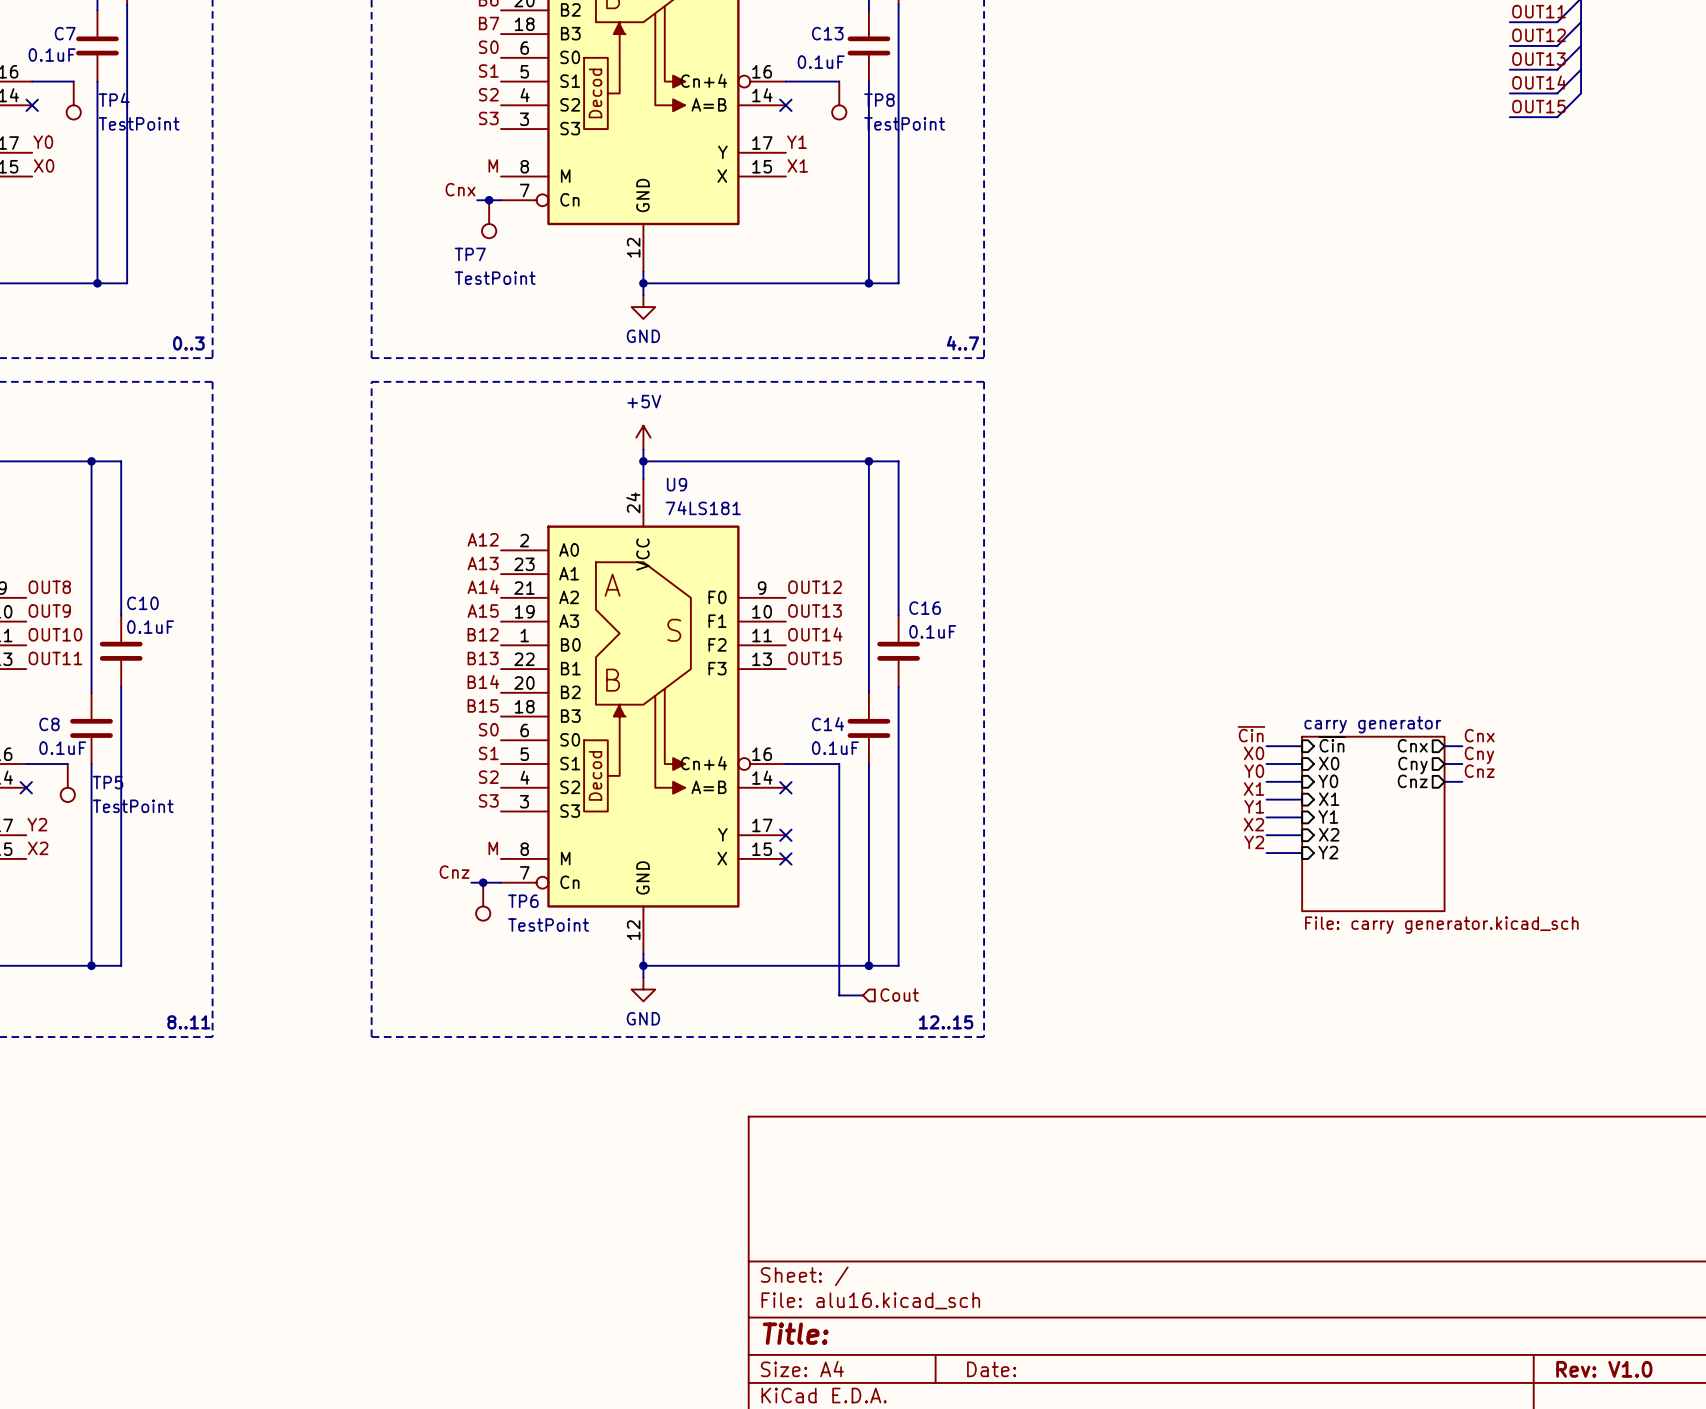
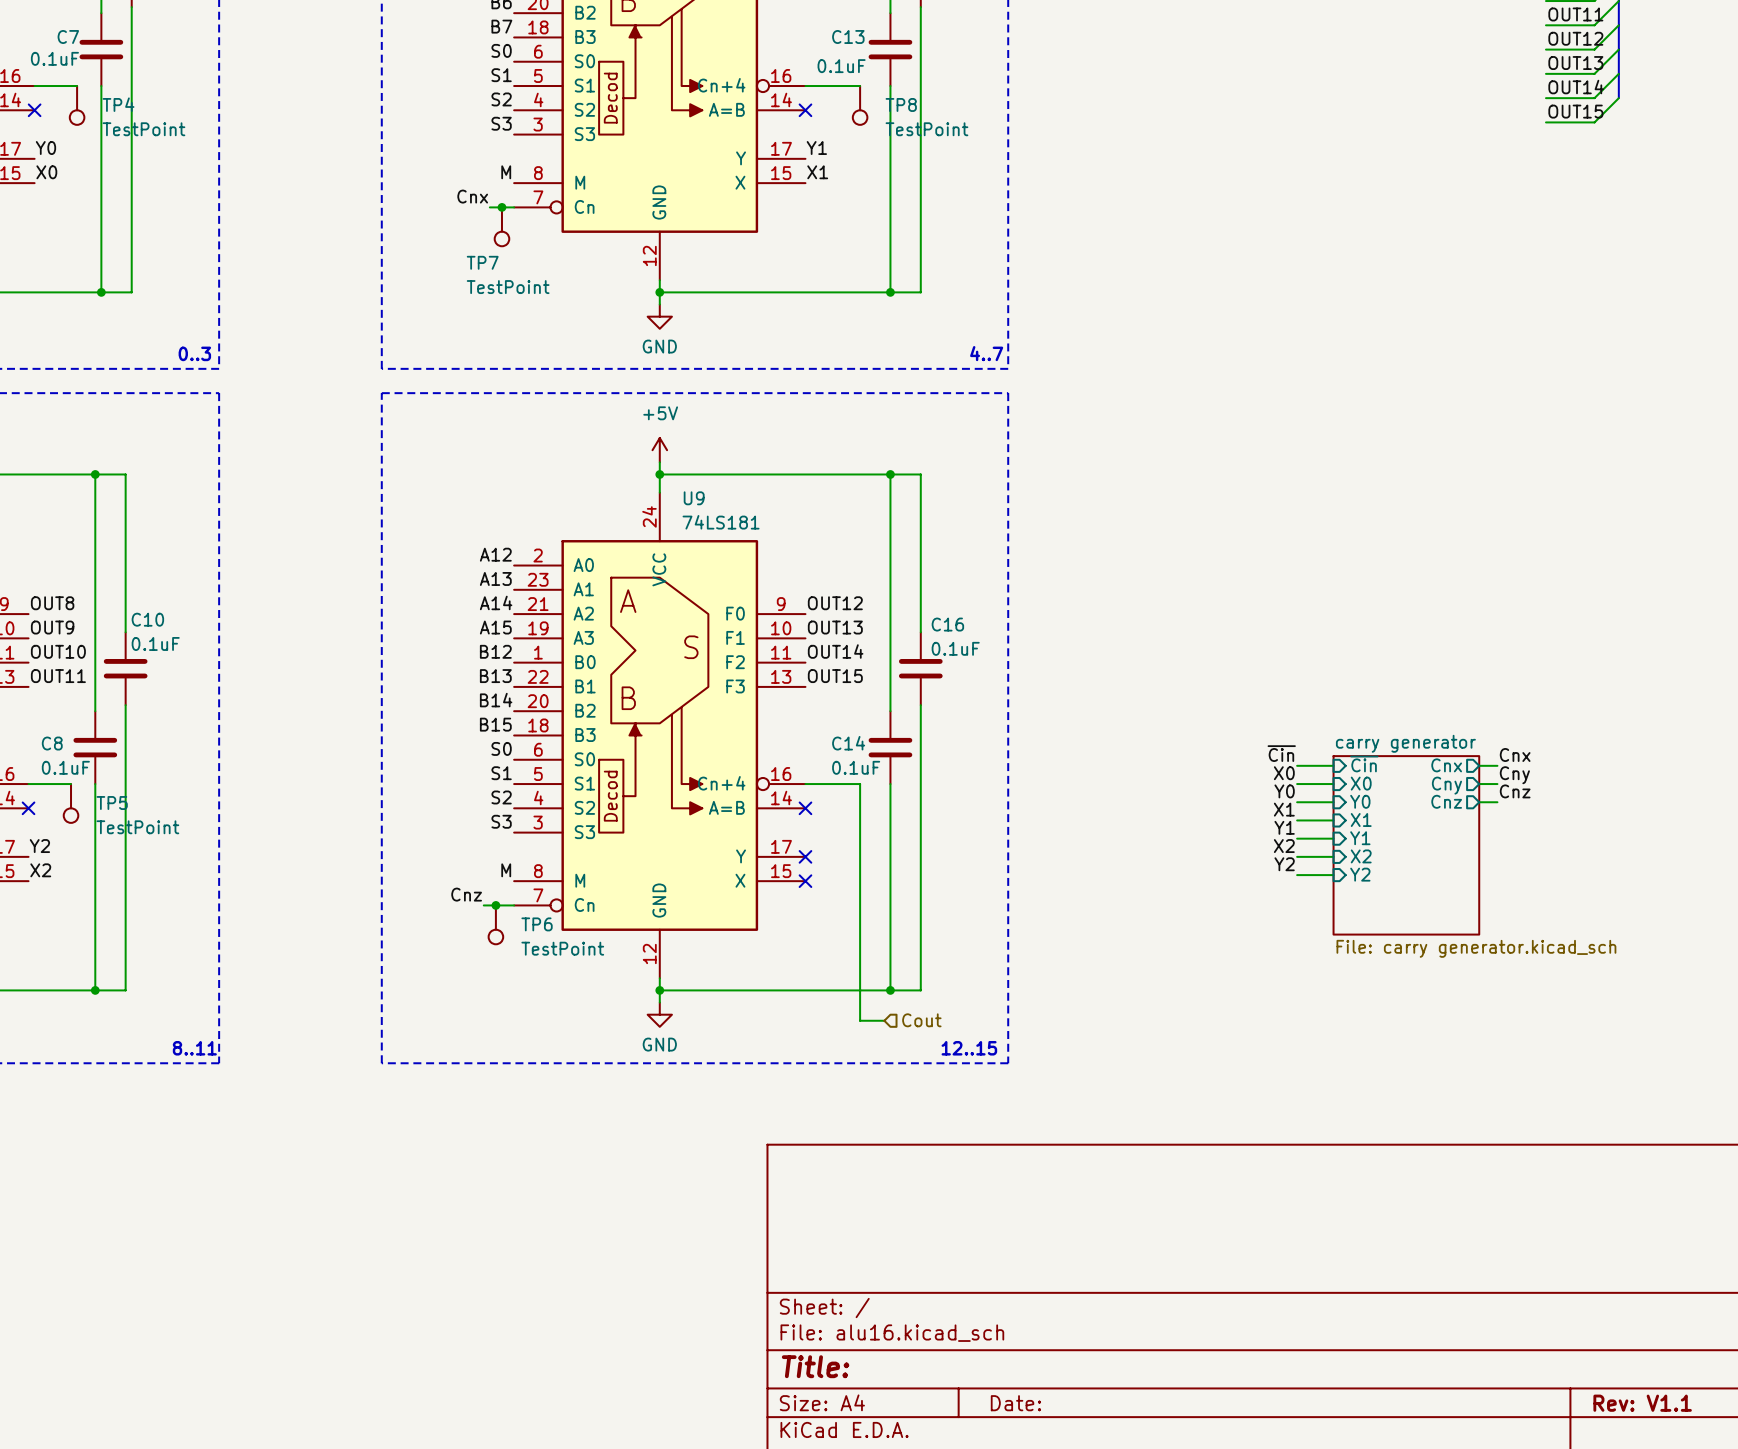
title block: Rev: V1.0 (1604, 1369) -> Rev: V1.1 (1642, 1403)

